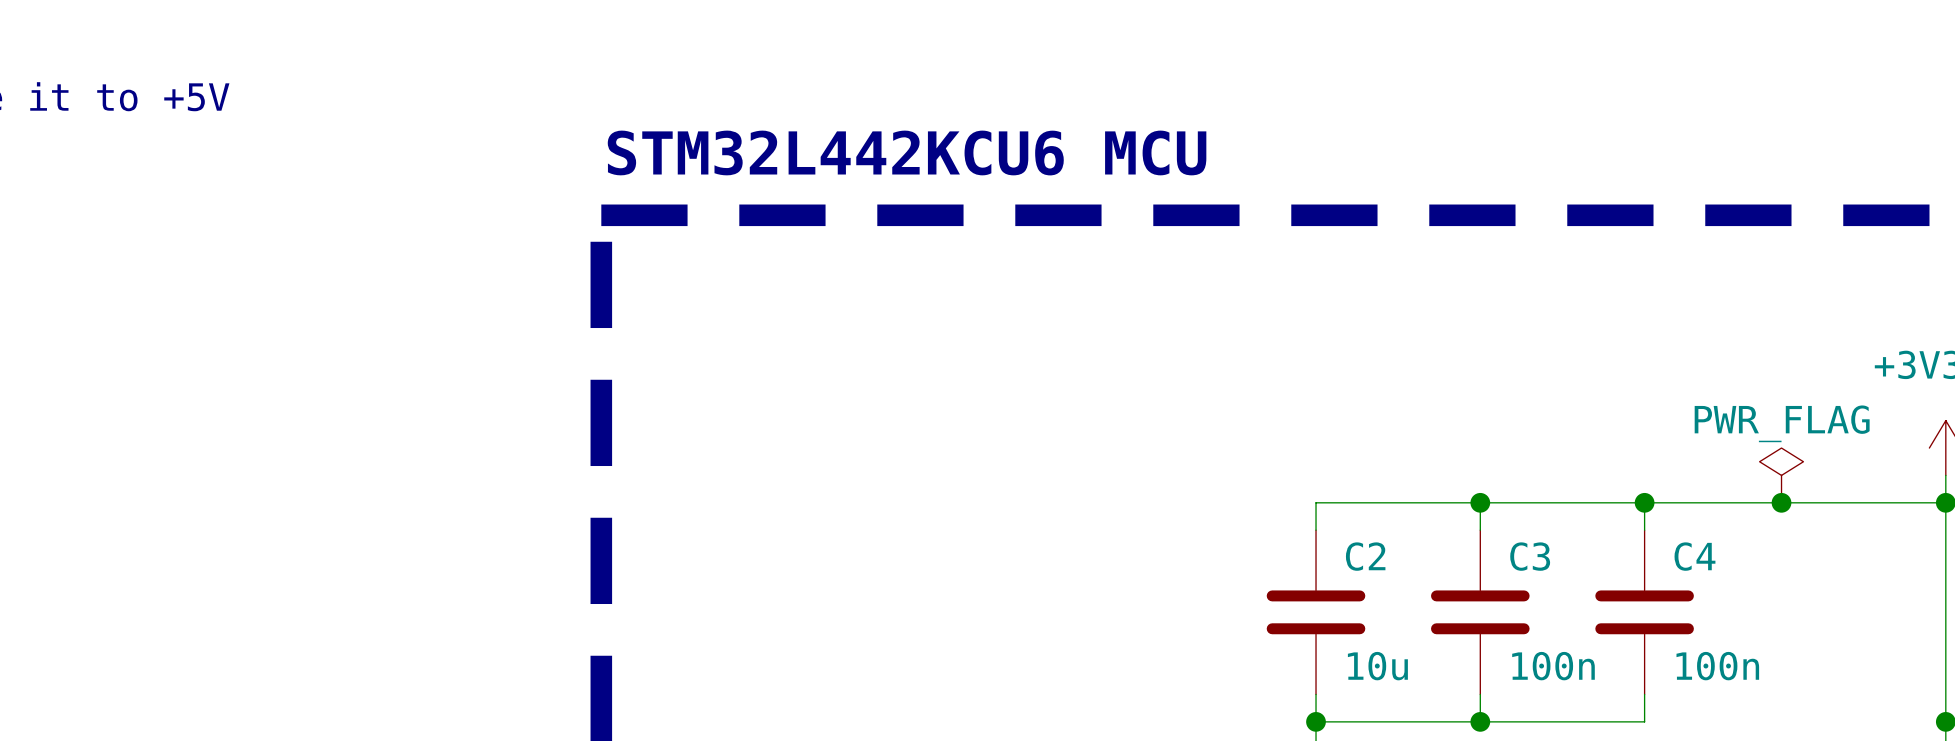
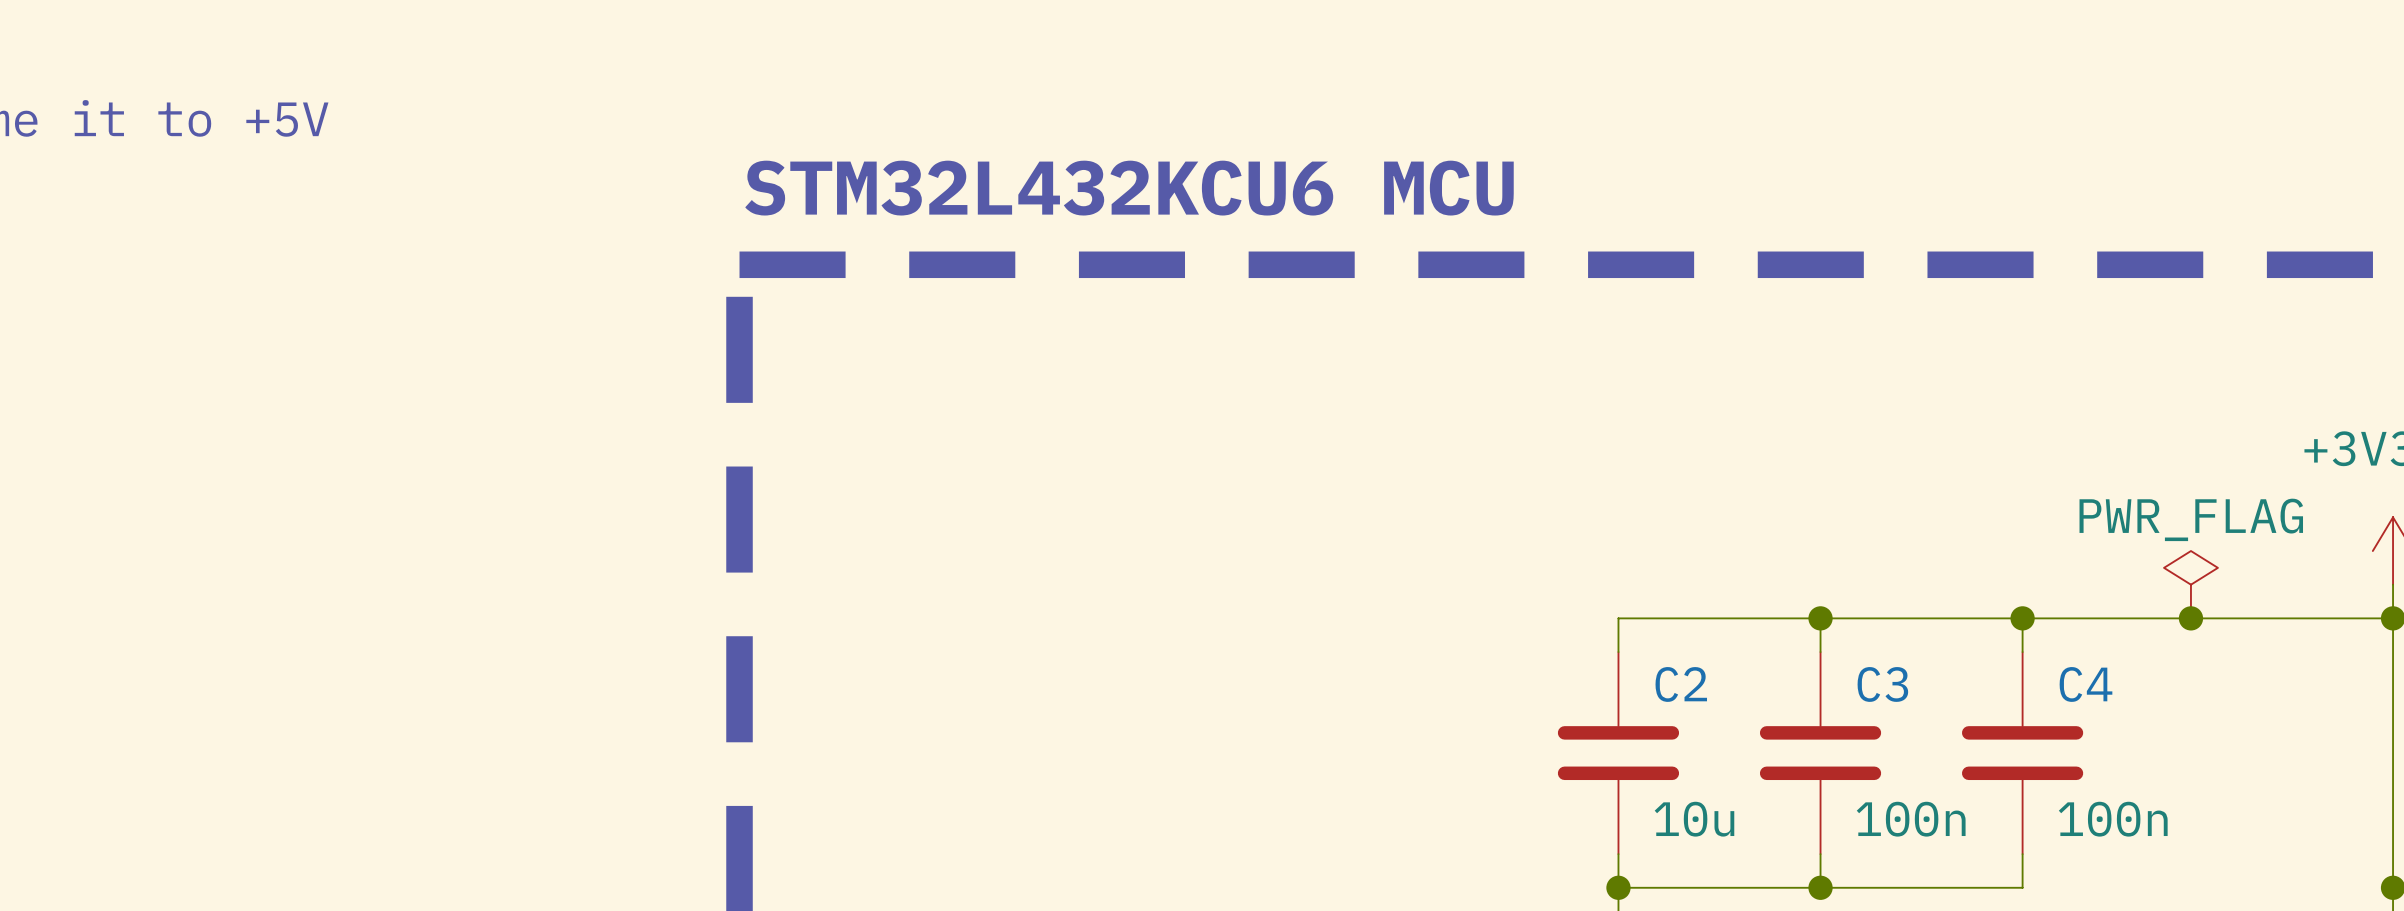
text: STM32L442KCU6 MCU (907, 153) -> STM32L432KCU6 MCU (1129, 188)

